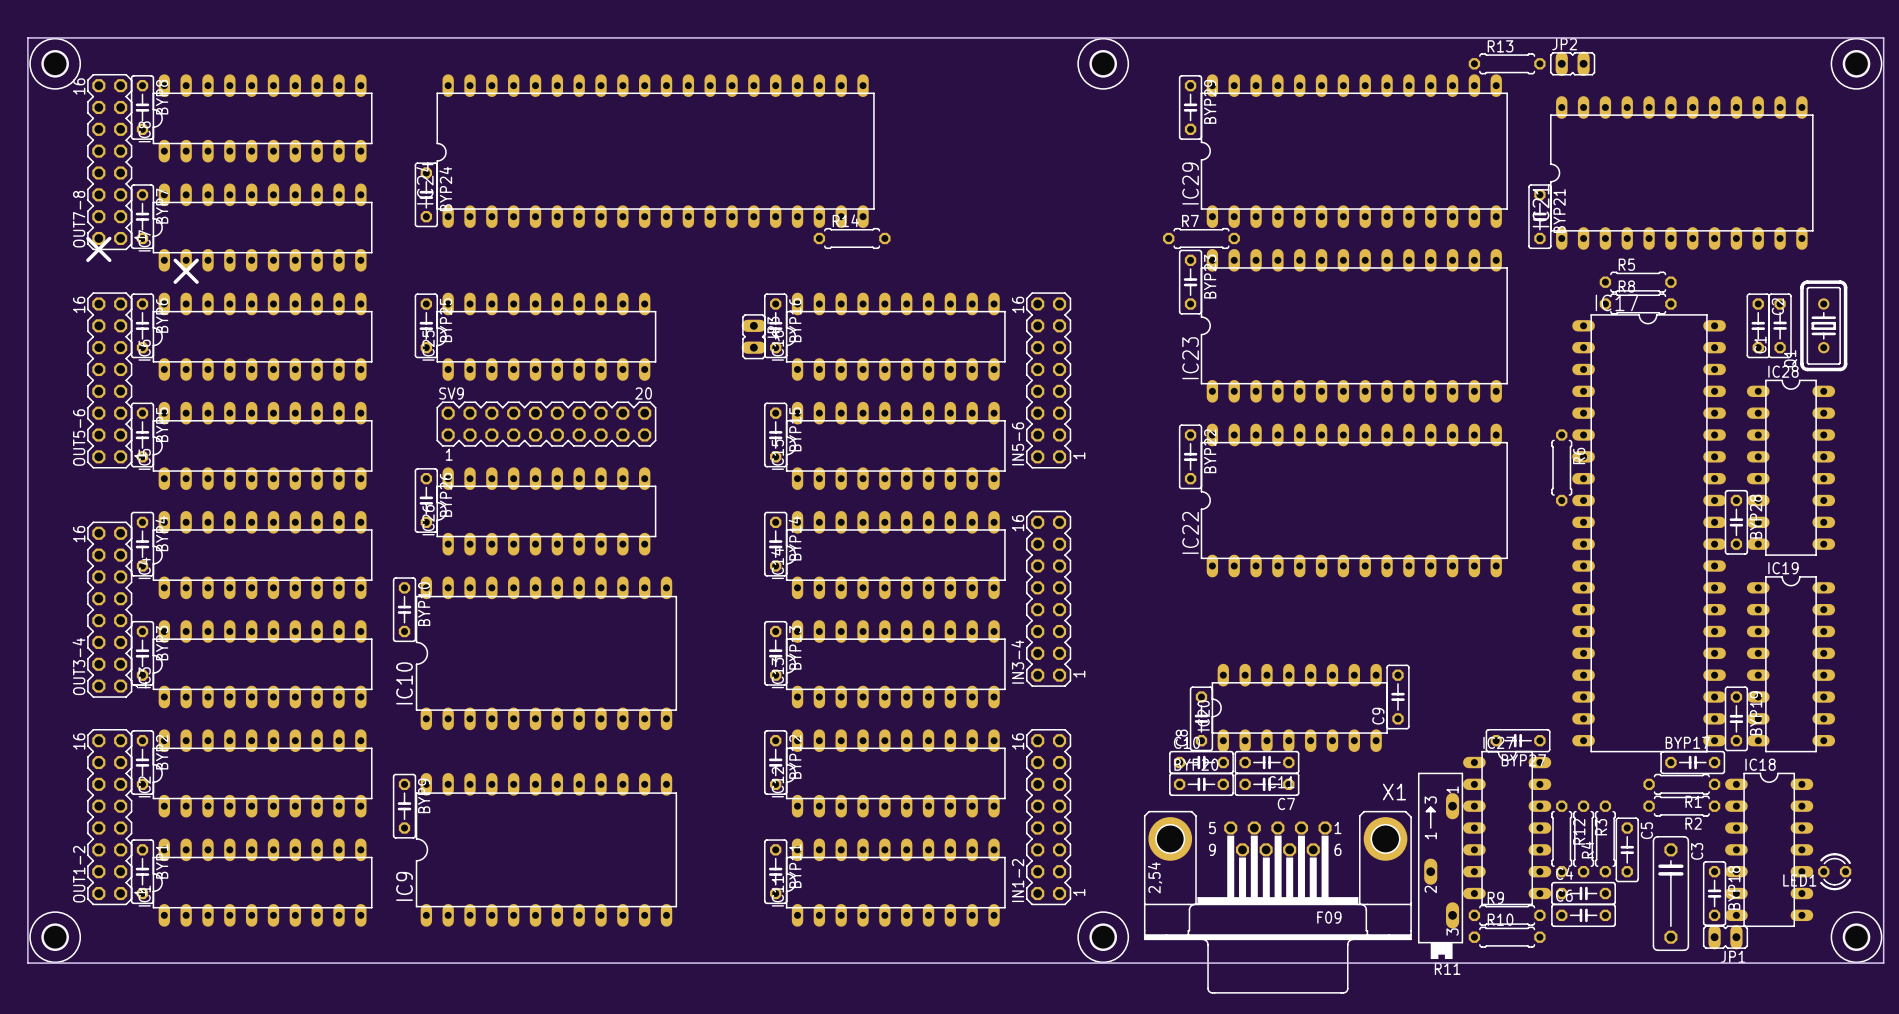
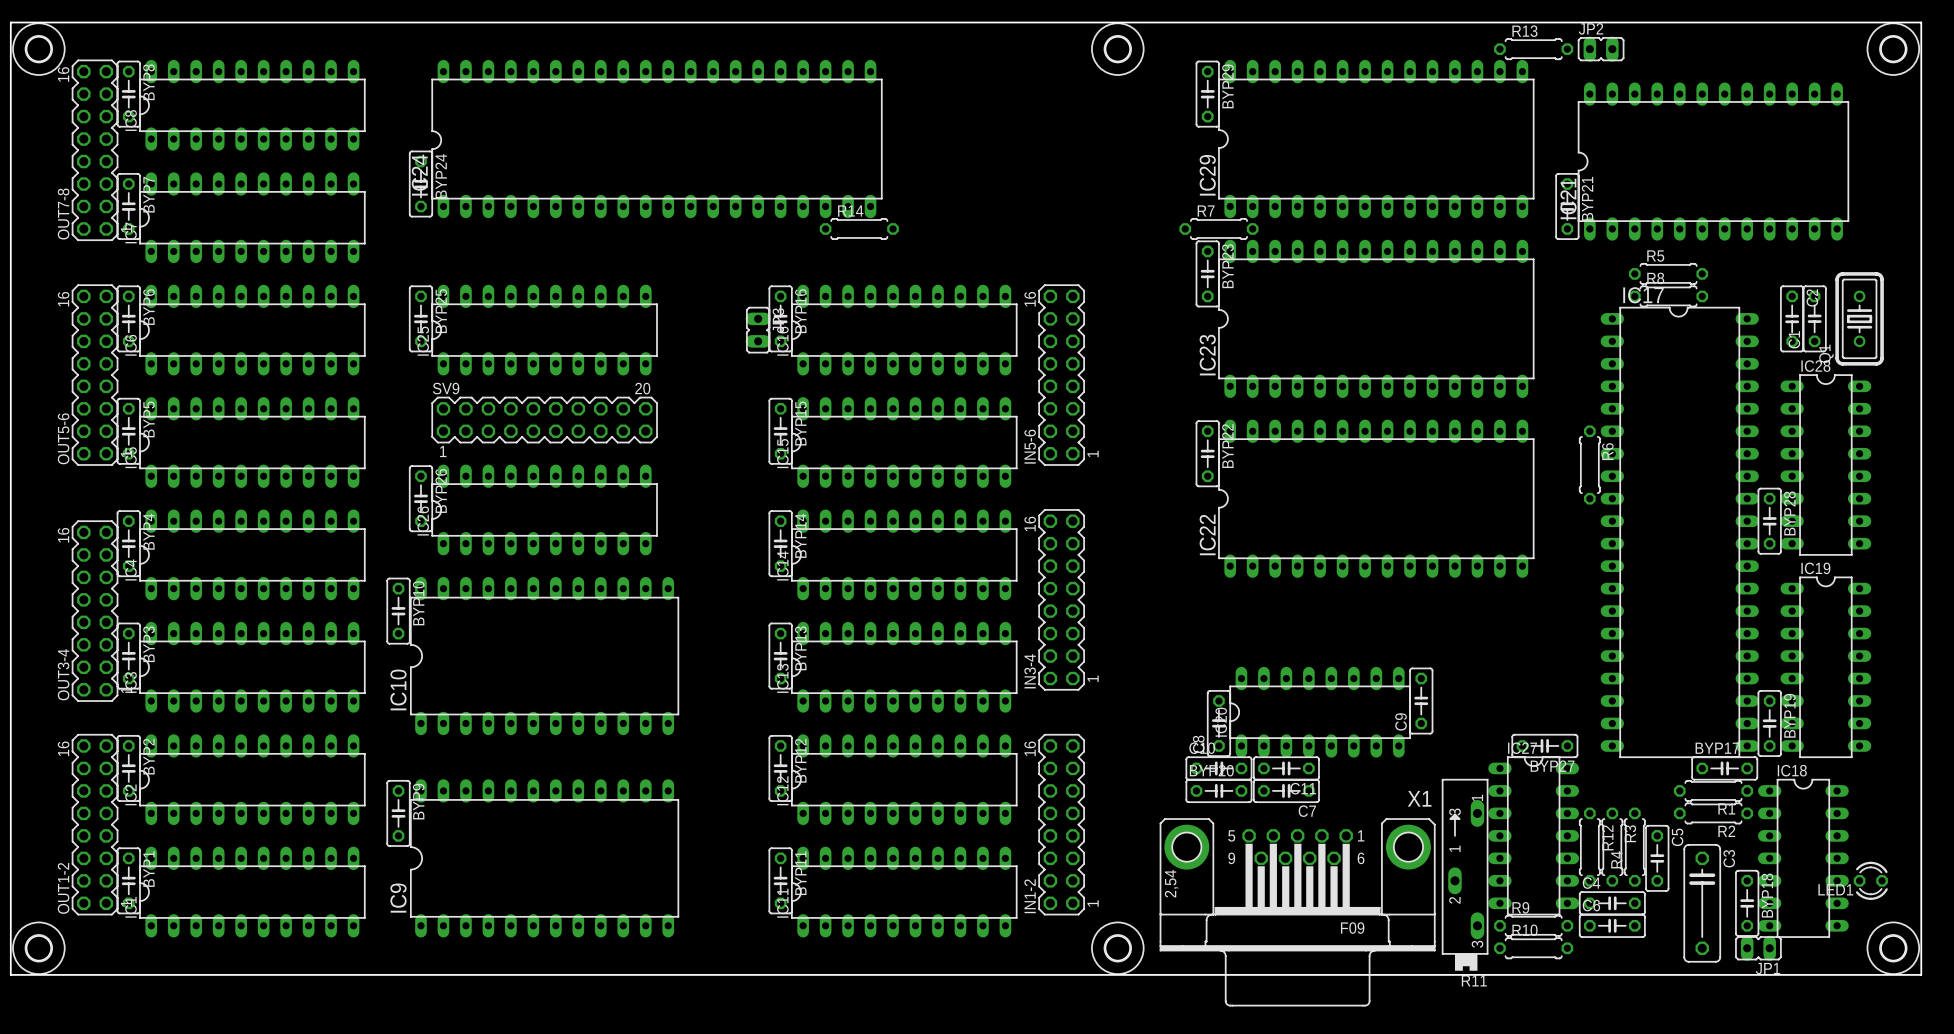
line: (87, 238) (109, 260) -> none
line: (109, 238) (87, 260) -> none
line: (175, 260) (197, 282) -> none
line: (197, 260) (175, 282) -> none

